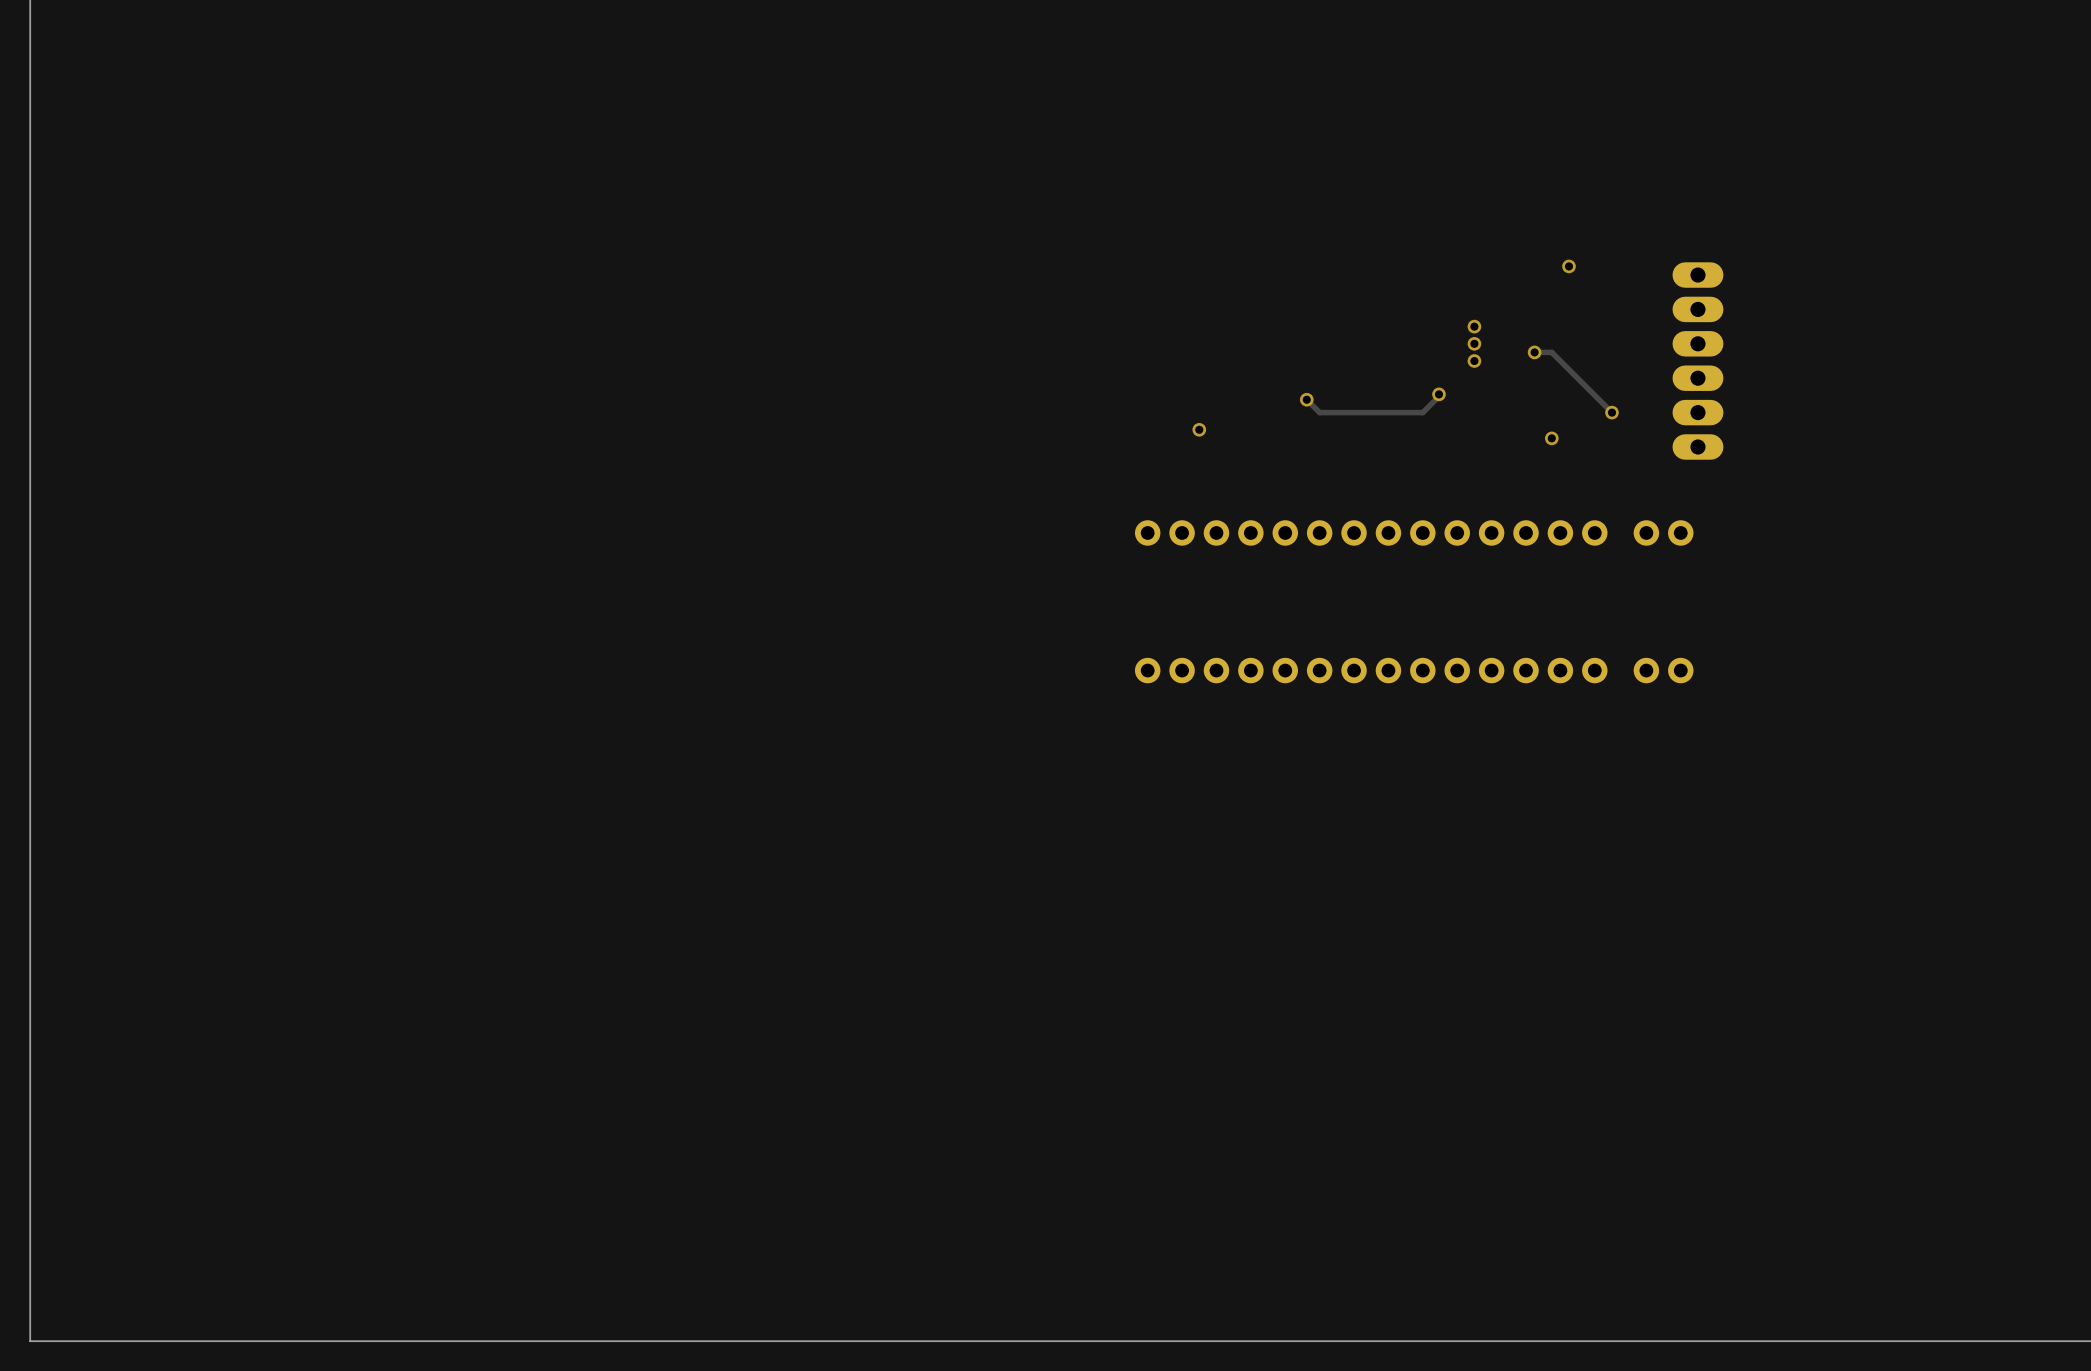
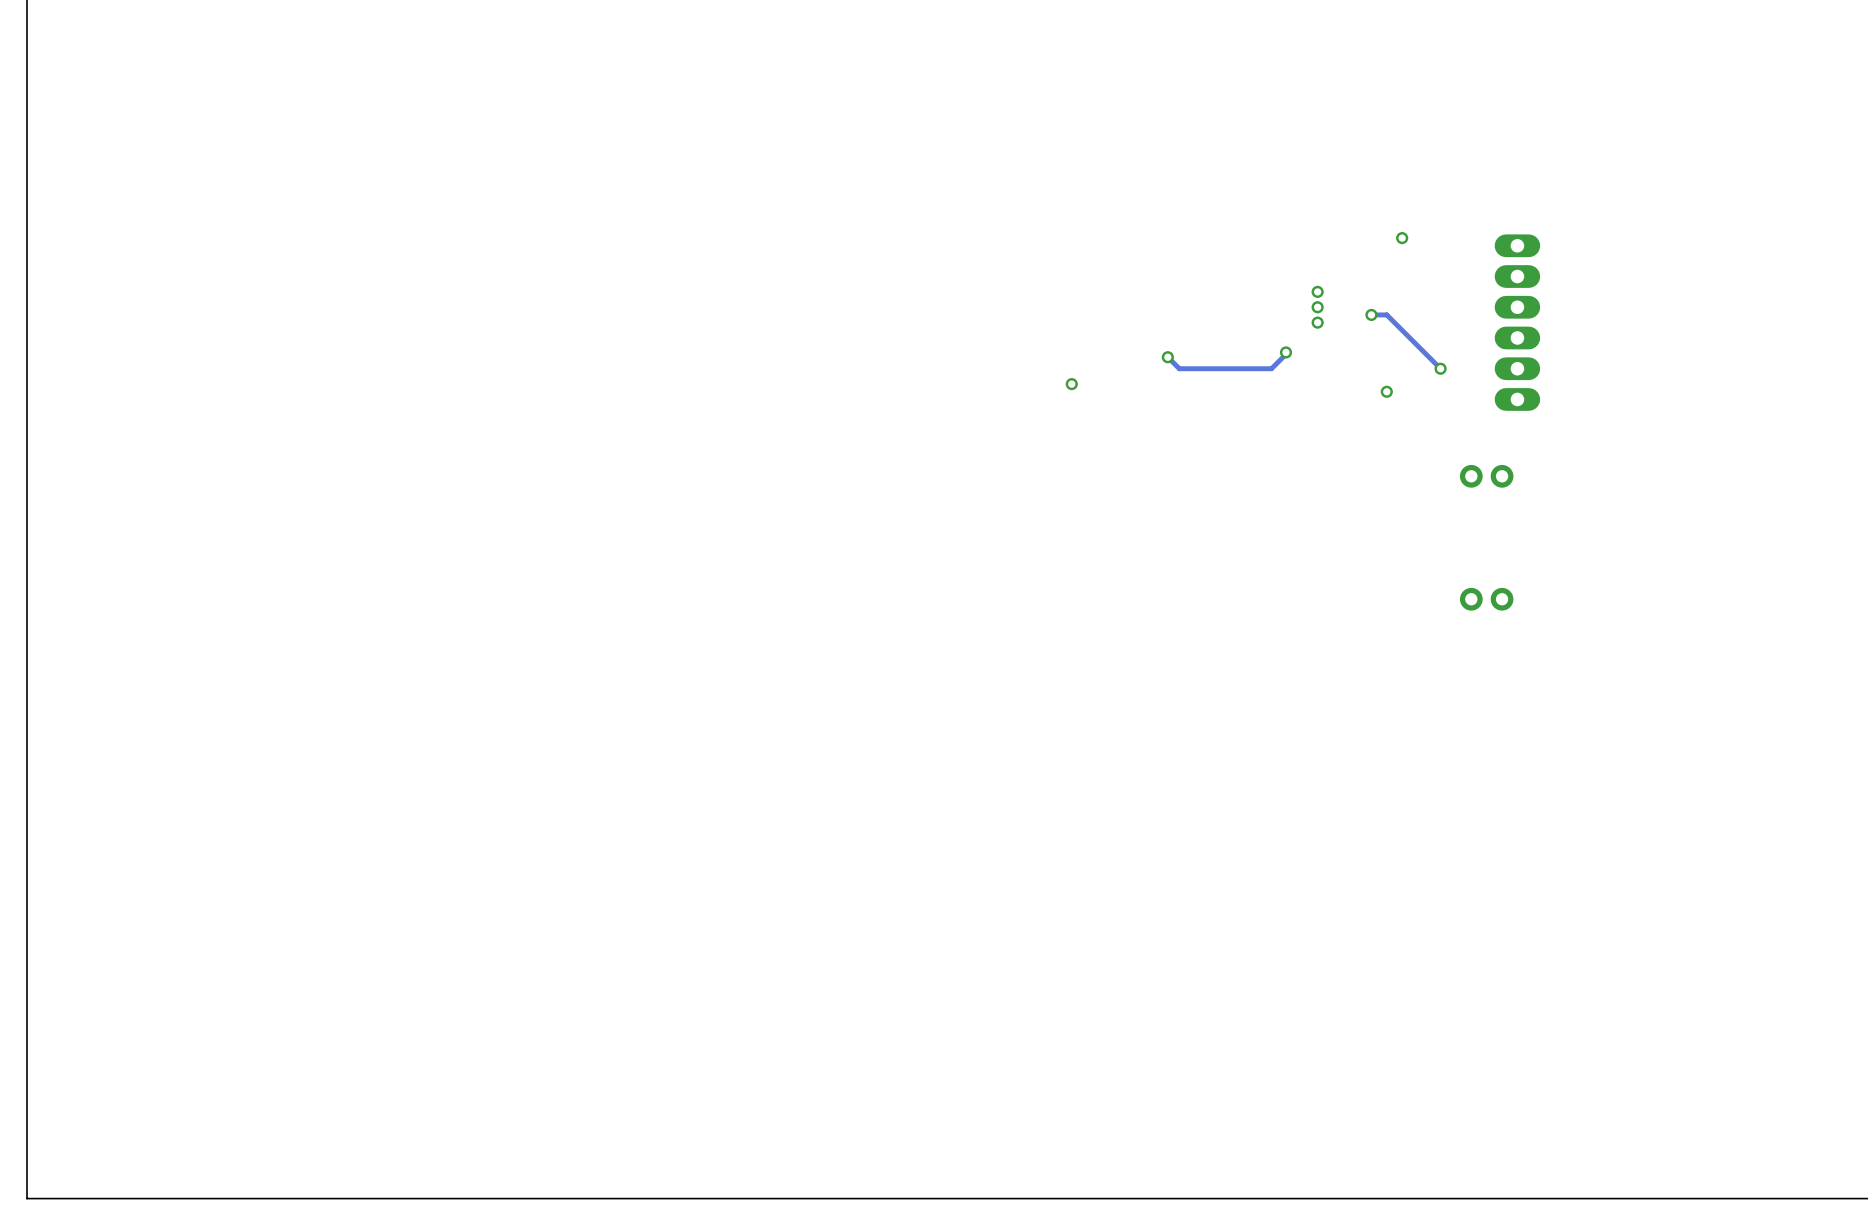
part: (1371, 532) -> none
part: (1371, 670) -> none

